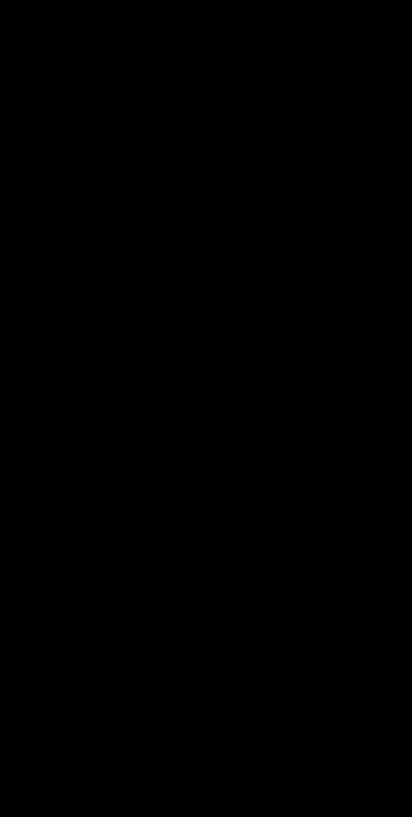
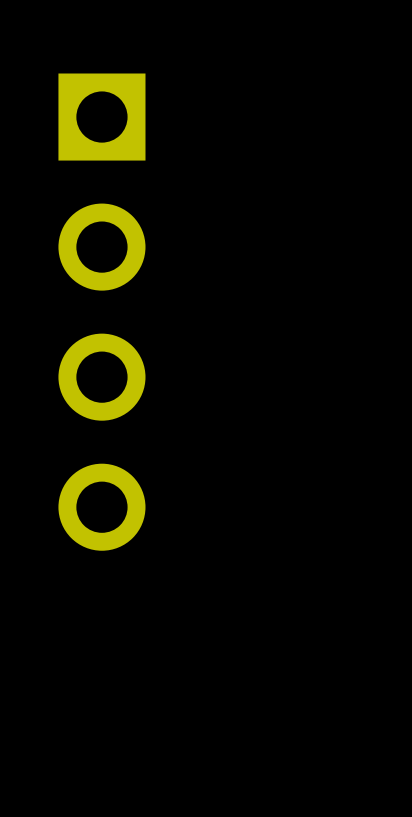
part: none -> (101, 312)

